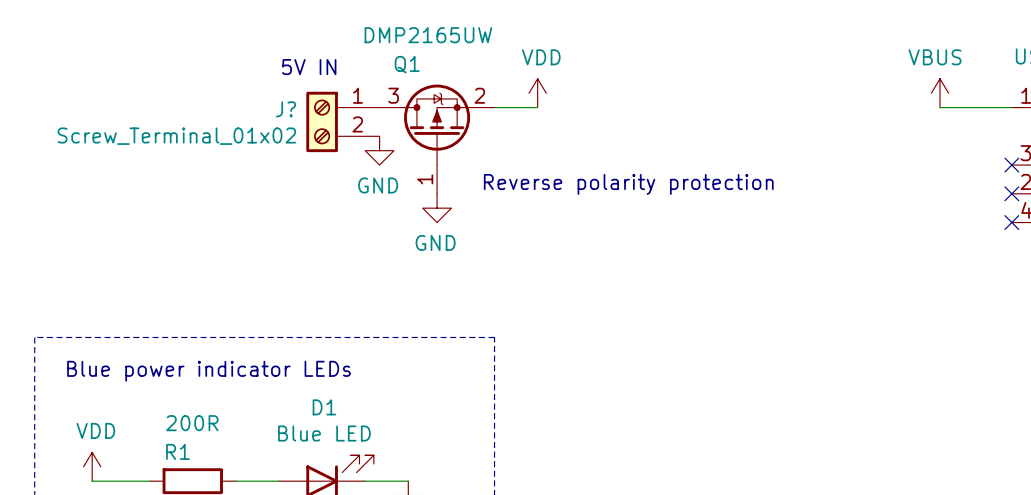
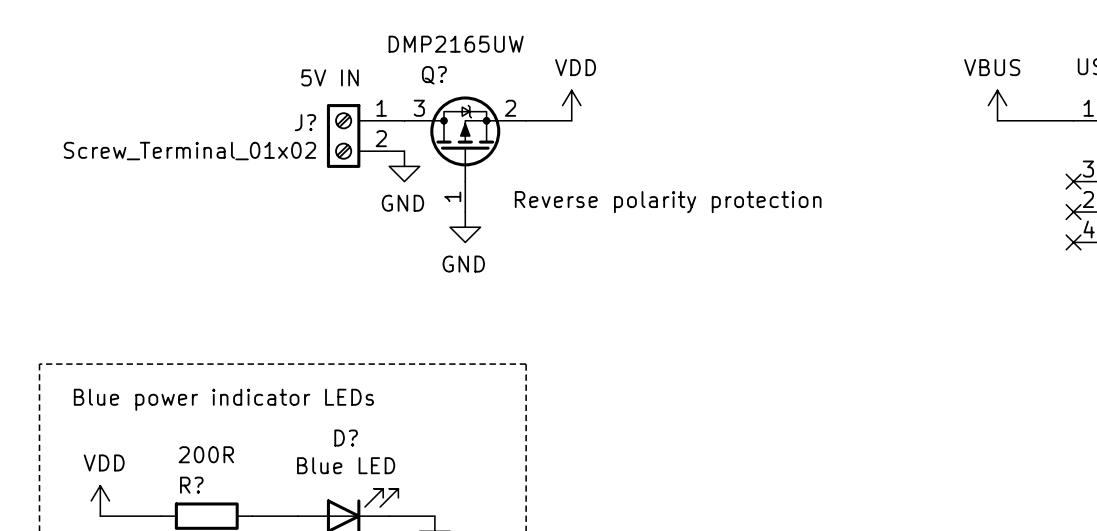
Q1 name: Q1 (407, 64) -> Q? (434, 75)
D1 name: D1 (324, 407) -> D? (346, 438)
R1 name: R1 (177, 451) -> R? (191, 485)

